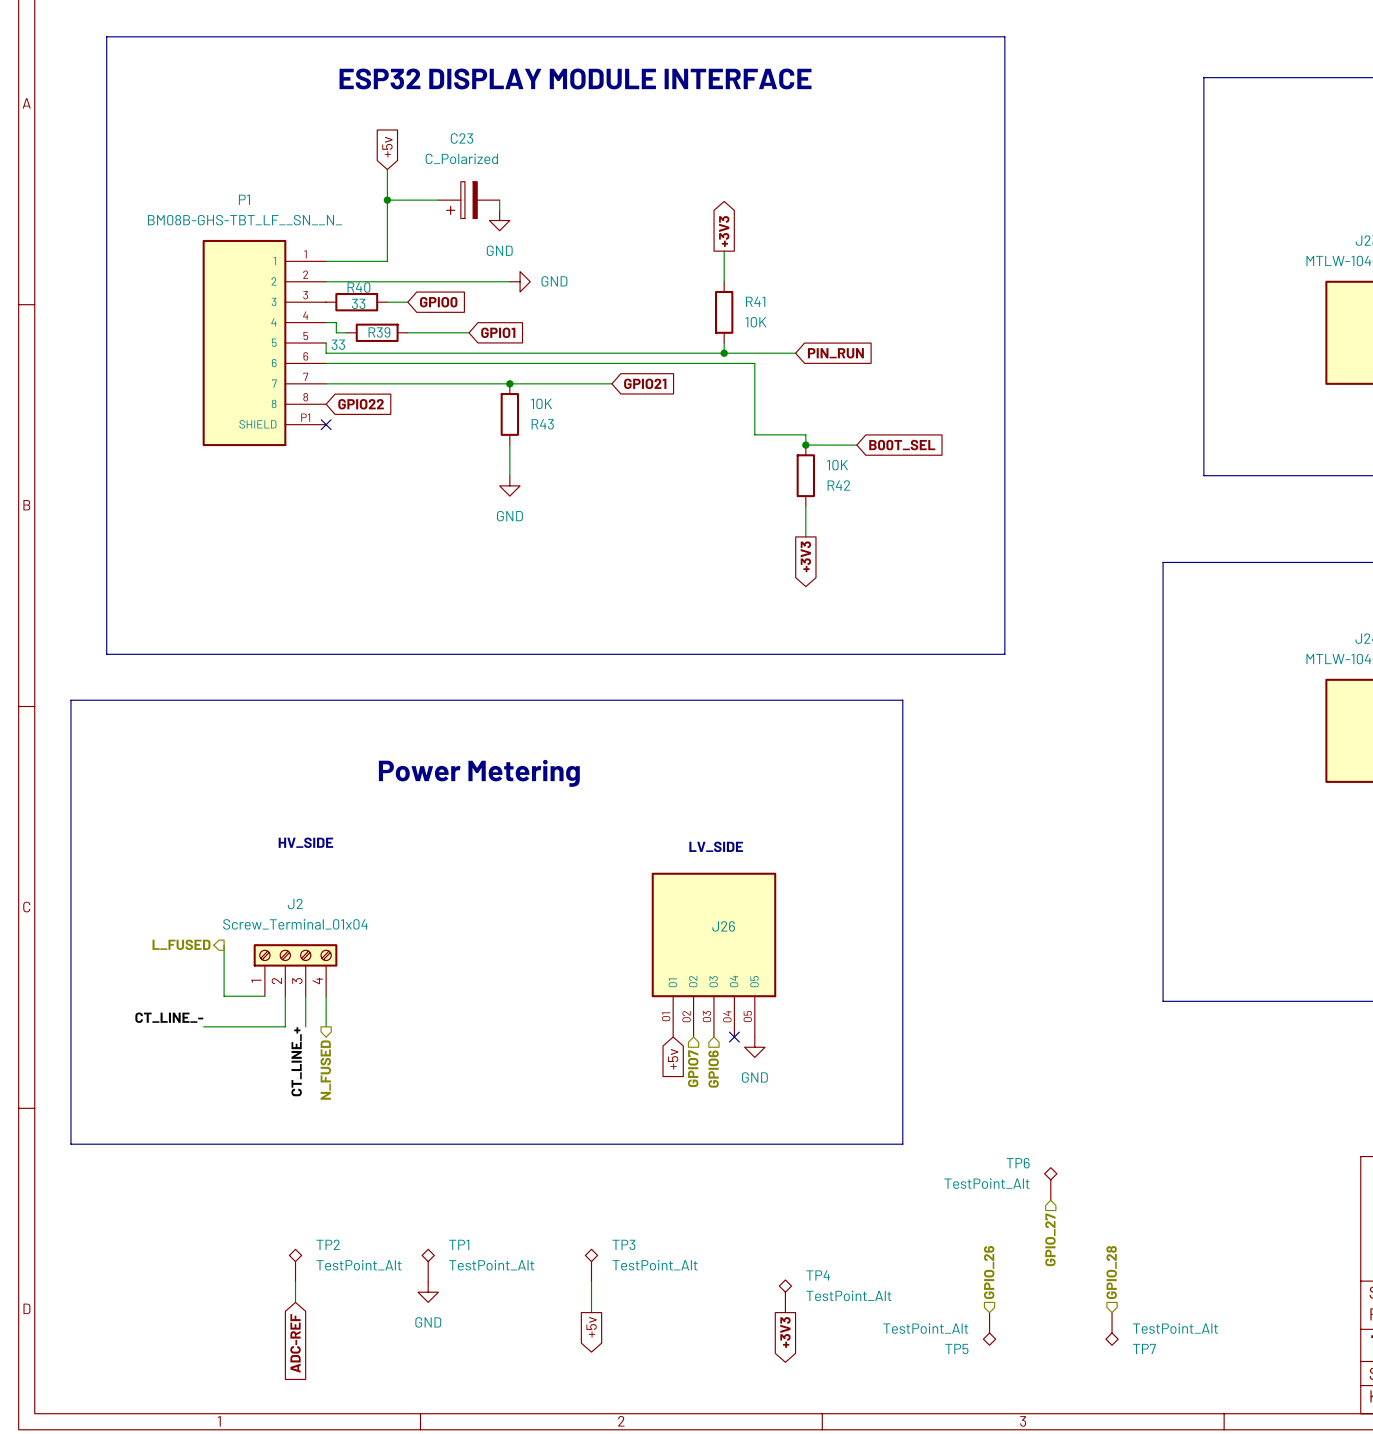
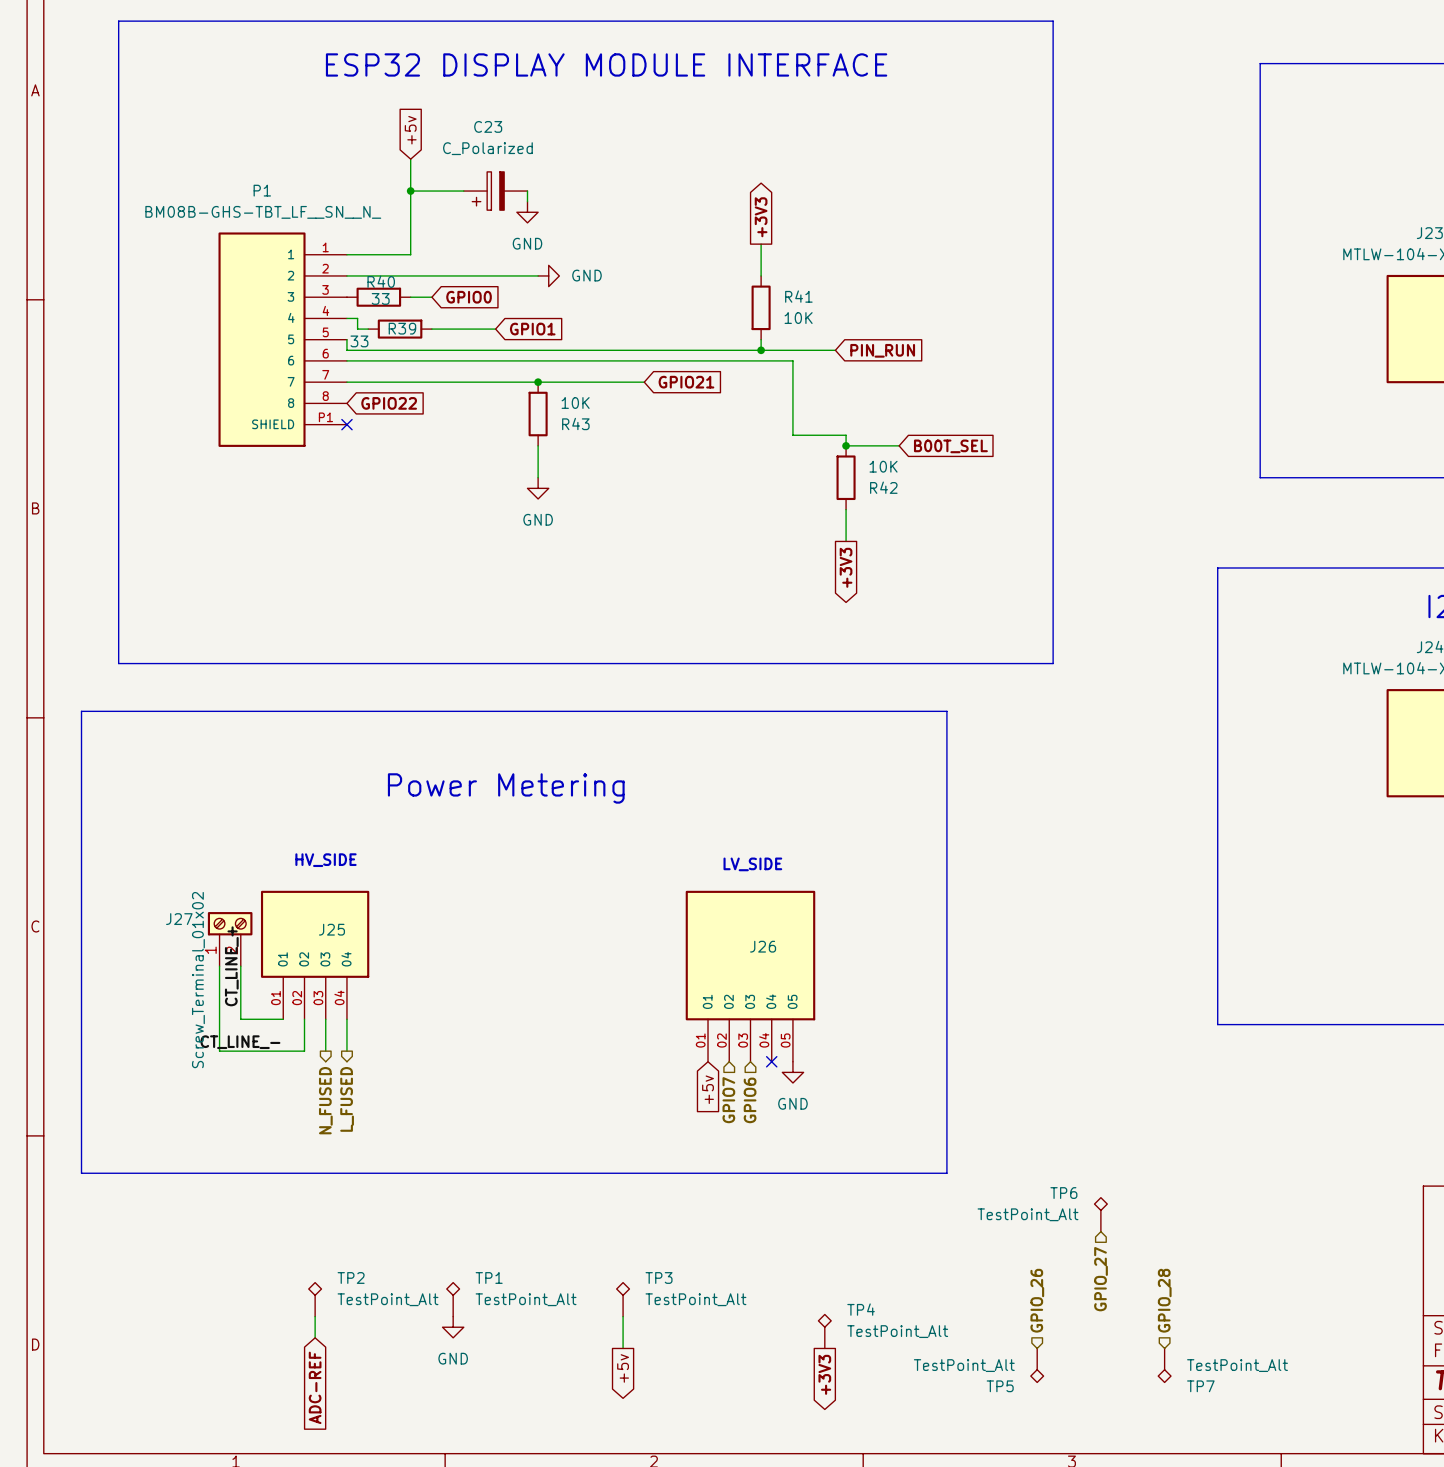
J27: none -> Screw_Terminal_01x02 (230, 939)
J25: none -> (315, 955)
hierarchical label: L_FUSED (181, 944) -> none
wire: none -> (219, 966) (219, 1051)
J2: Screw_Terminal_01x04 (295, 970) -> none
label position: CT_LINE_- (169, 1017) -> CT_LINE_- (240, 1042)
label position: CT_LINE_+ (296, 1061) -> CT_LINE_+ (231, 966)
hierarchical label: none -> N_FUSED (325, 1100)
hierarchical label: N_FUSED (325, 1070) -> L_FUSED (347, 1099)

